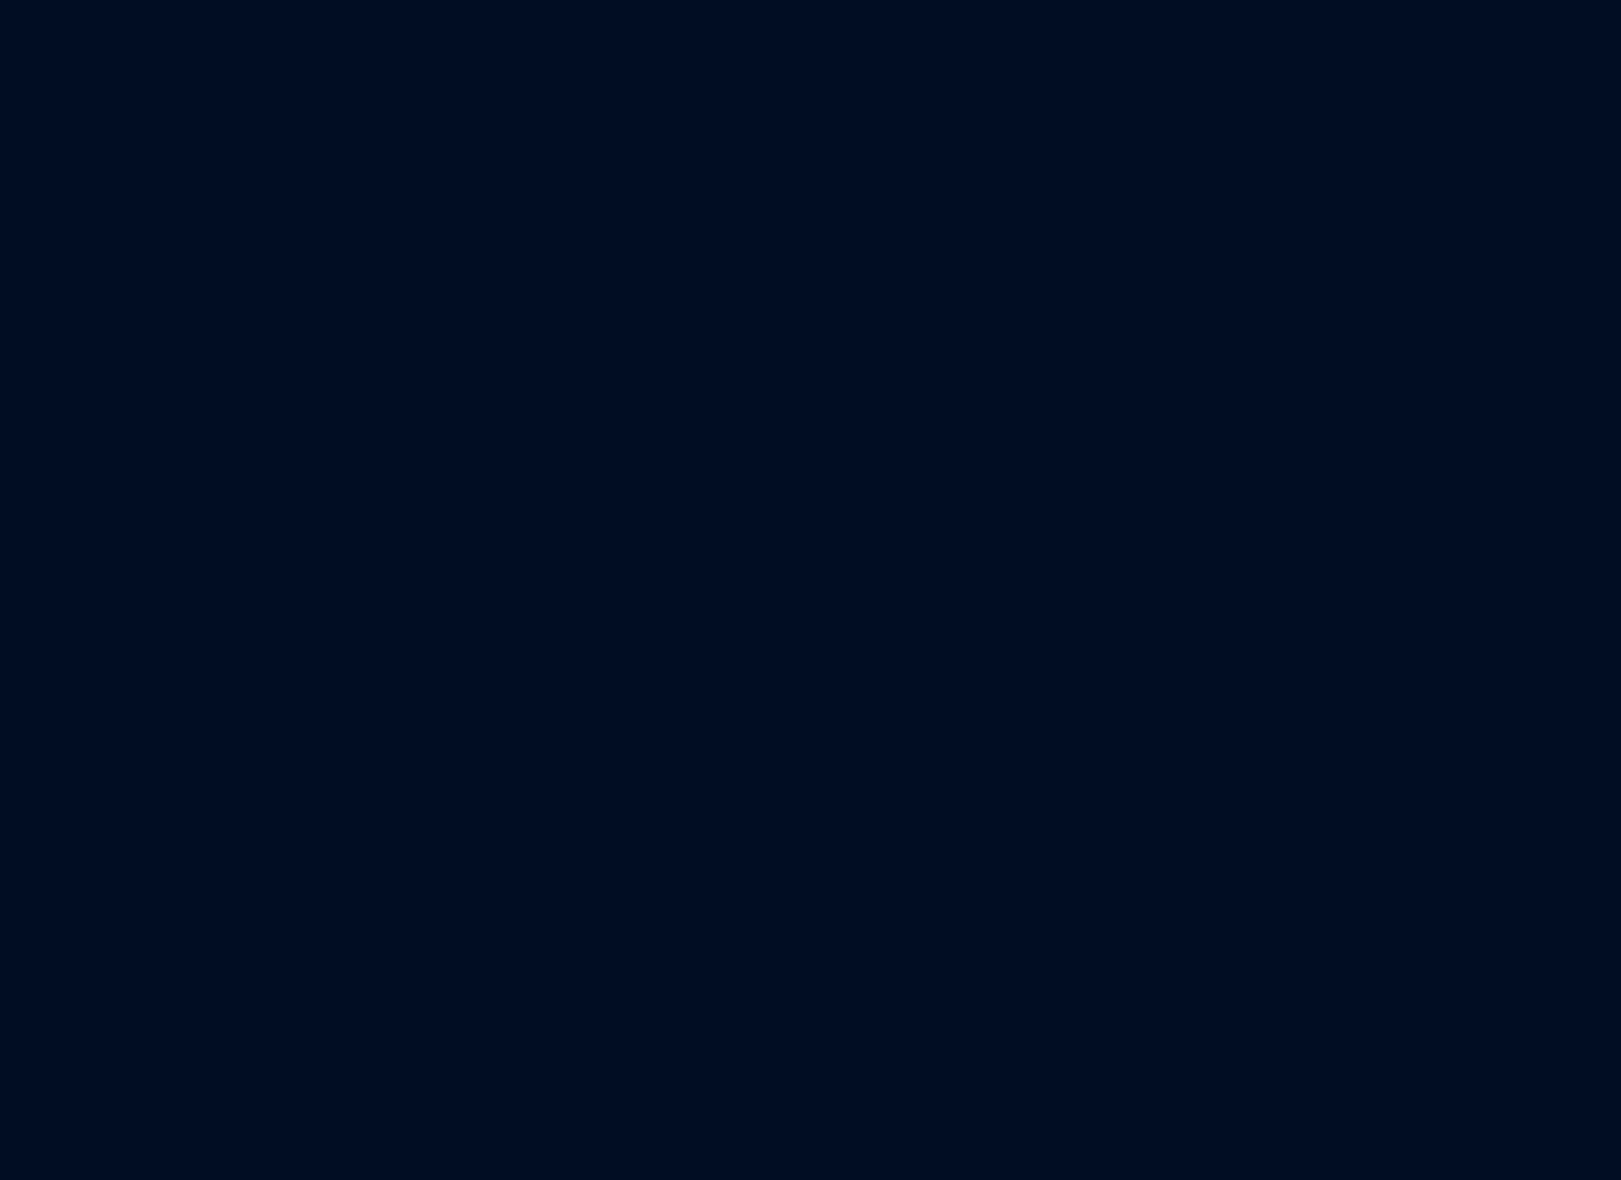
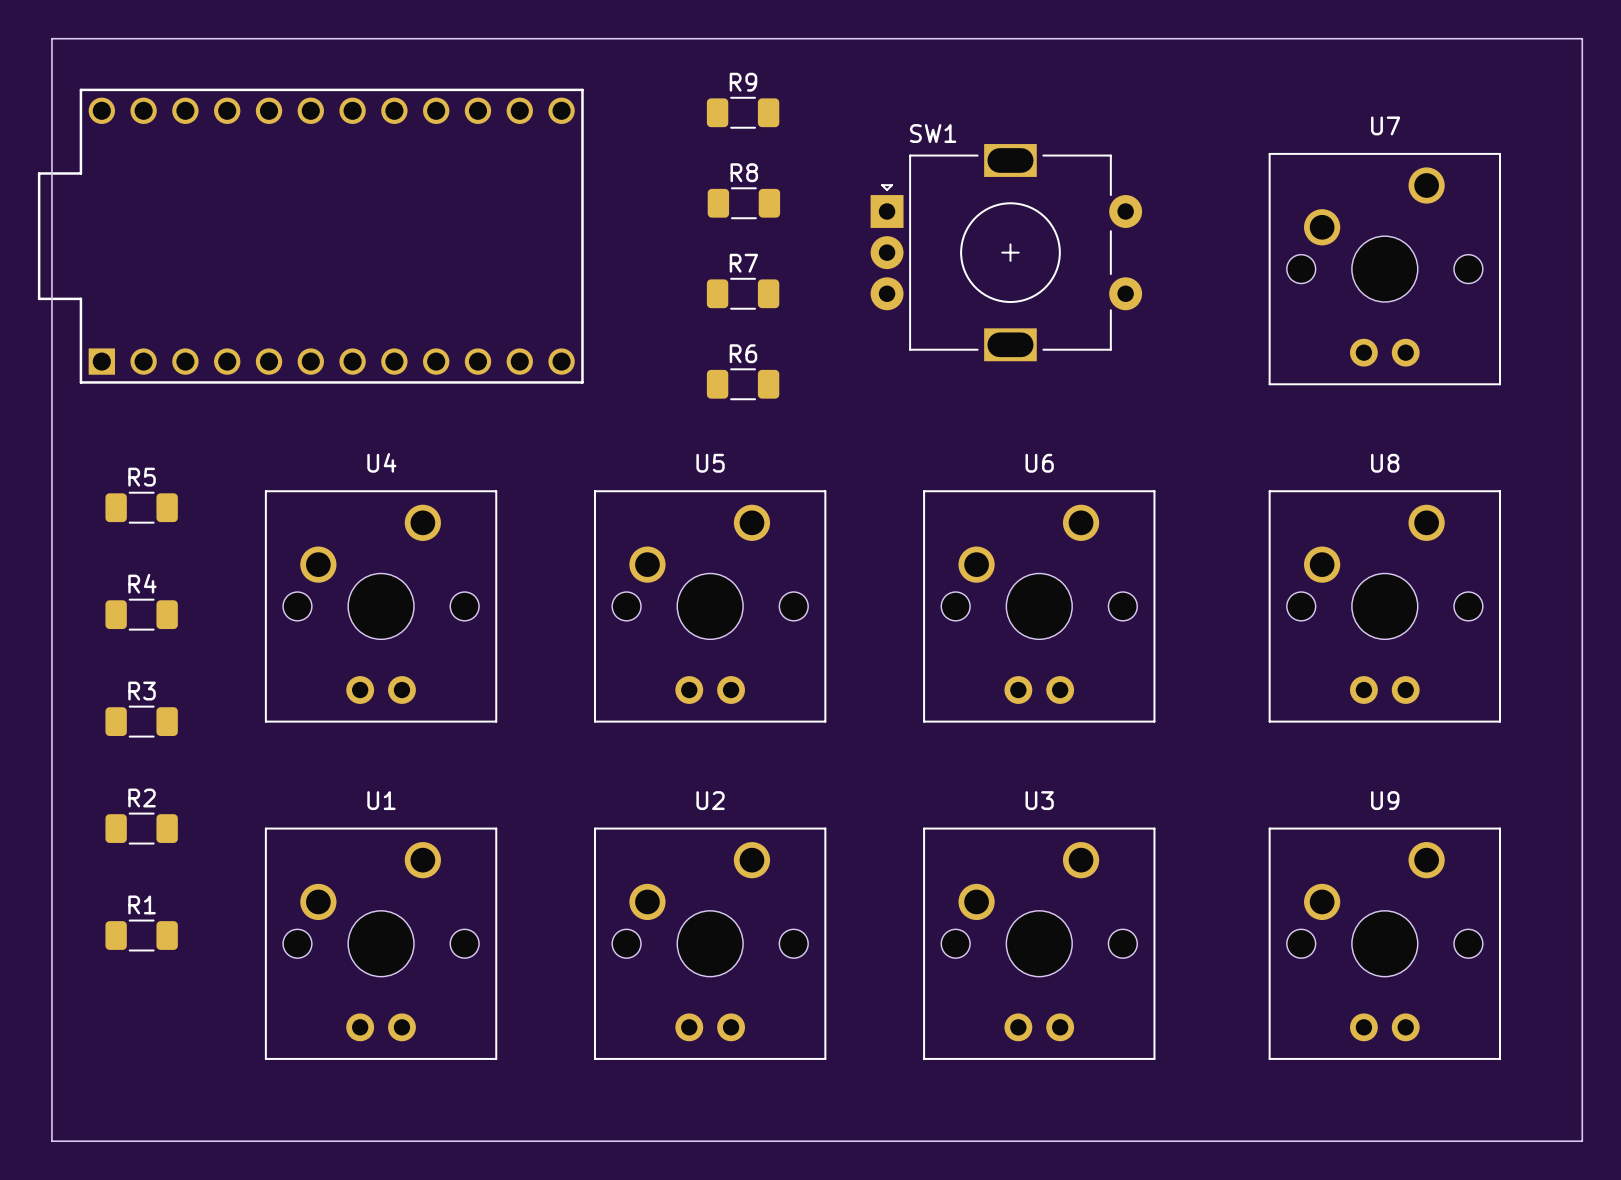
board edge: none -> (51, 38) (1582, 38) (1582, 1141) (51, 1141) (51, 38)
R9: none -> (743, 112)
R8: none -> (743, 203)
part: none -> (310, 236)
SW1: none -> (1006, 252)
U7: none -> (1384, 269)
R7: none -> (743, 293)
R6: none -> (743, 384)
R5: none -> (141, 507)
U4: none -> (381, 606)
U5: none -> (710, 606)
U6: none -> (1039, 606)
U8: none -> (1384, 606)
R4: none -> (141, 614)
R3: none -> (141, 721)
R2: none -> (141, 828)
R1: none -> (141, 935)
U1: none -> (381, 943)
U2: none -> (710, 943)
U3: none -> (1039, 943)
U9: none -> (1384, 943)

